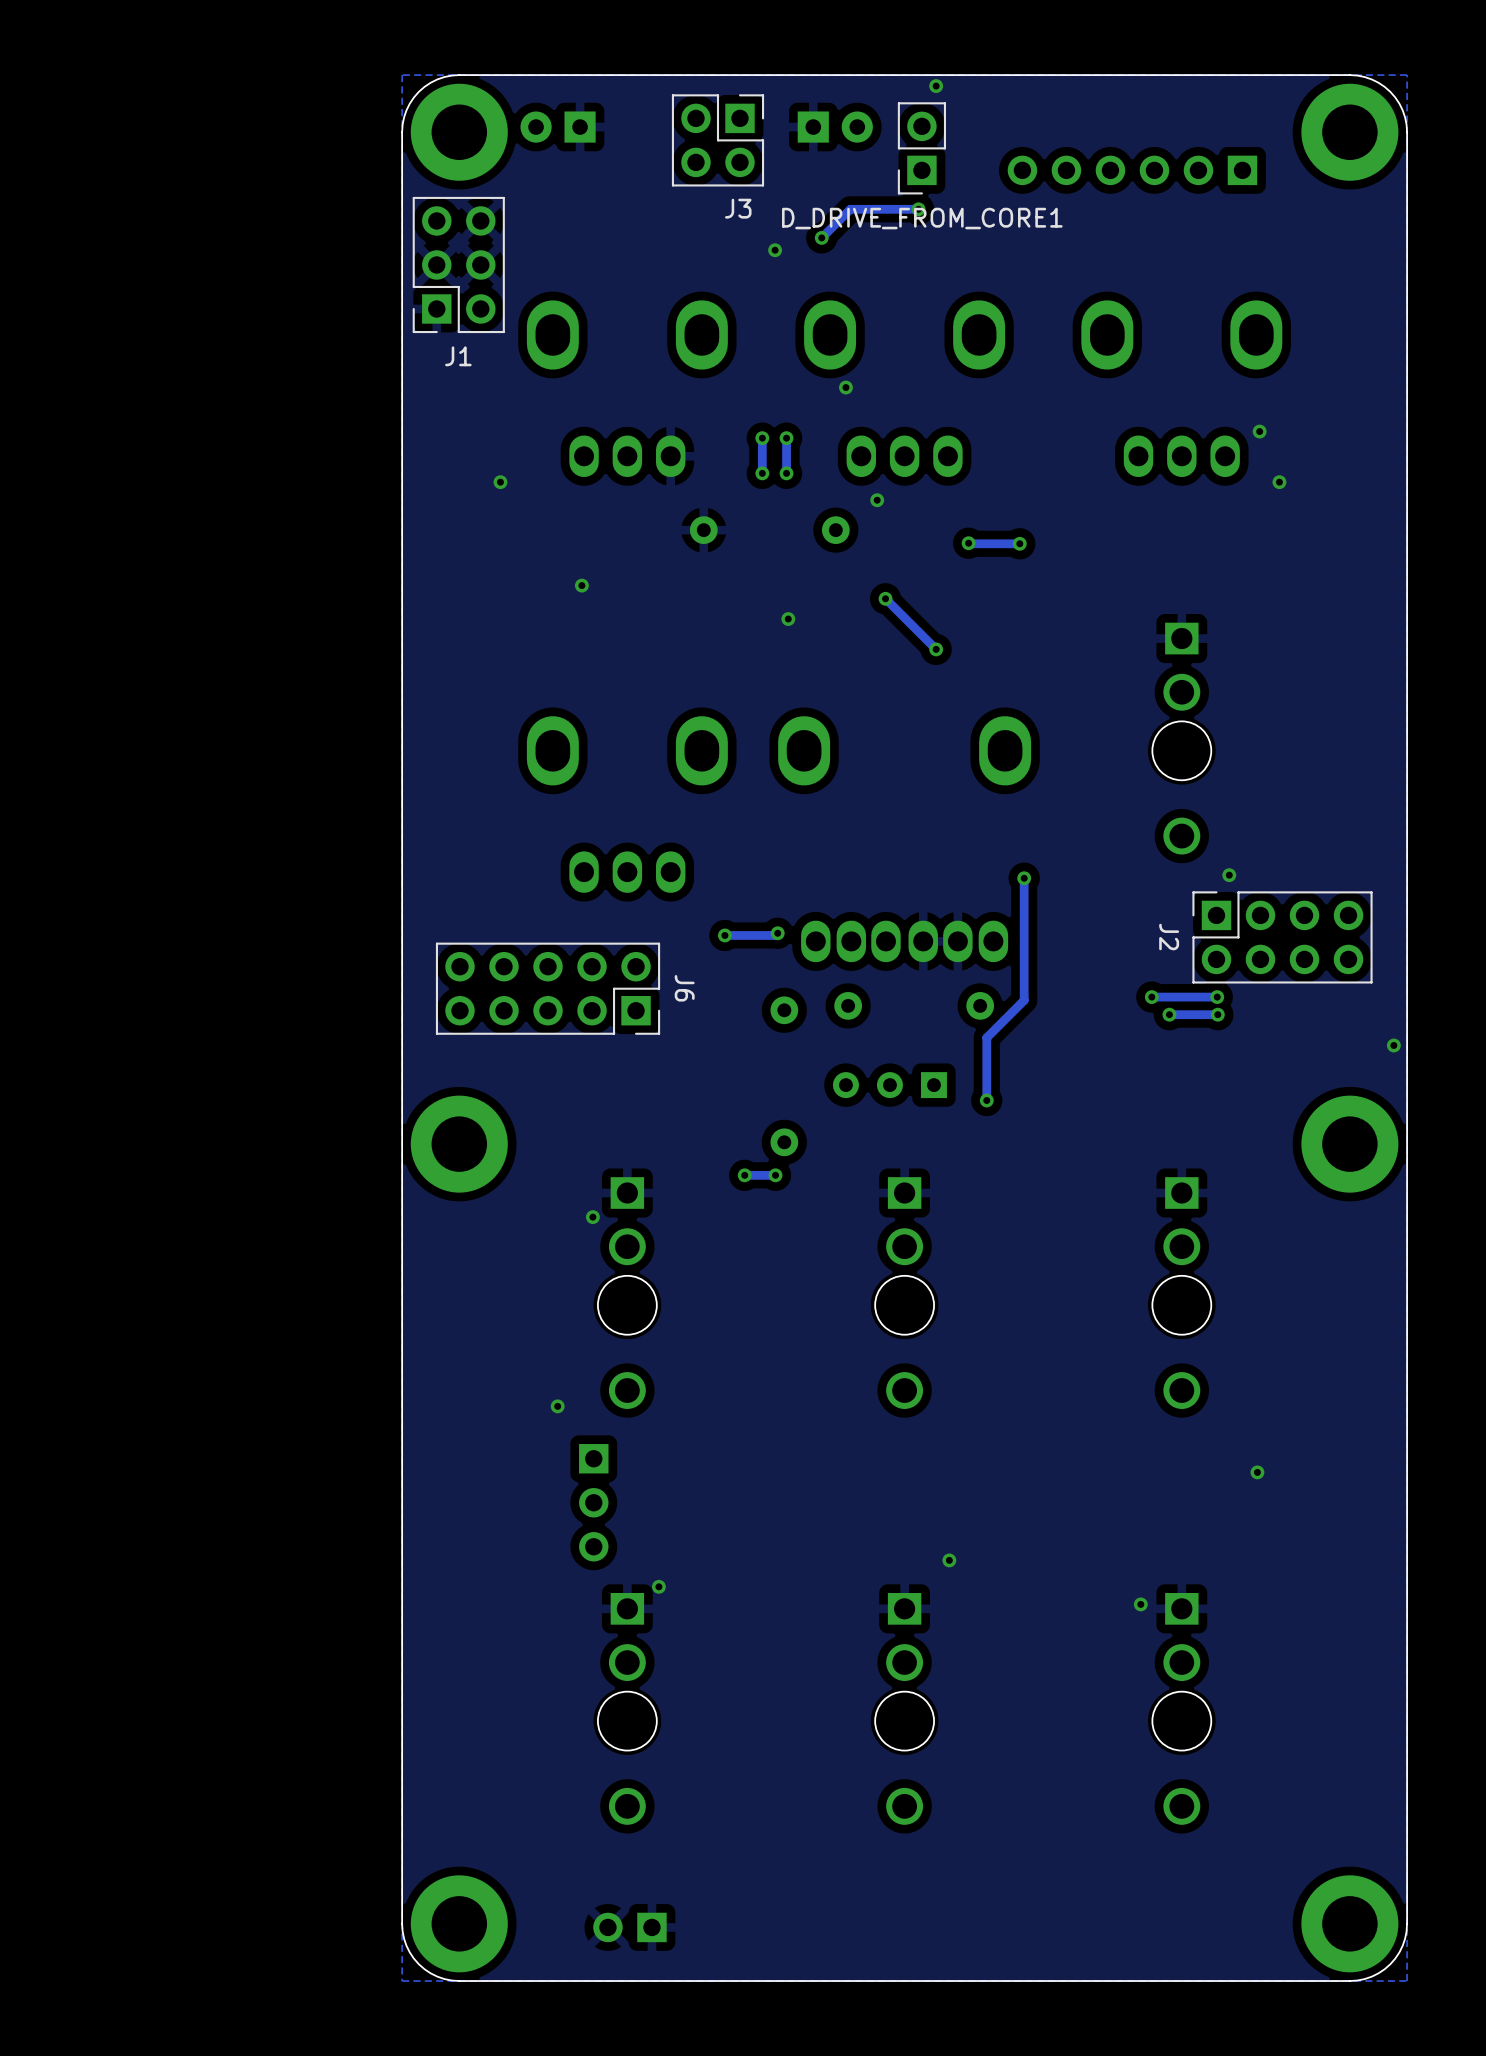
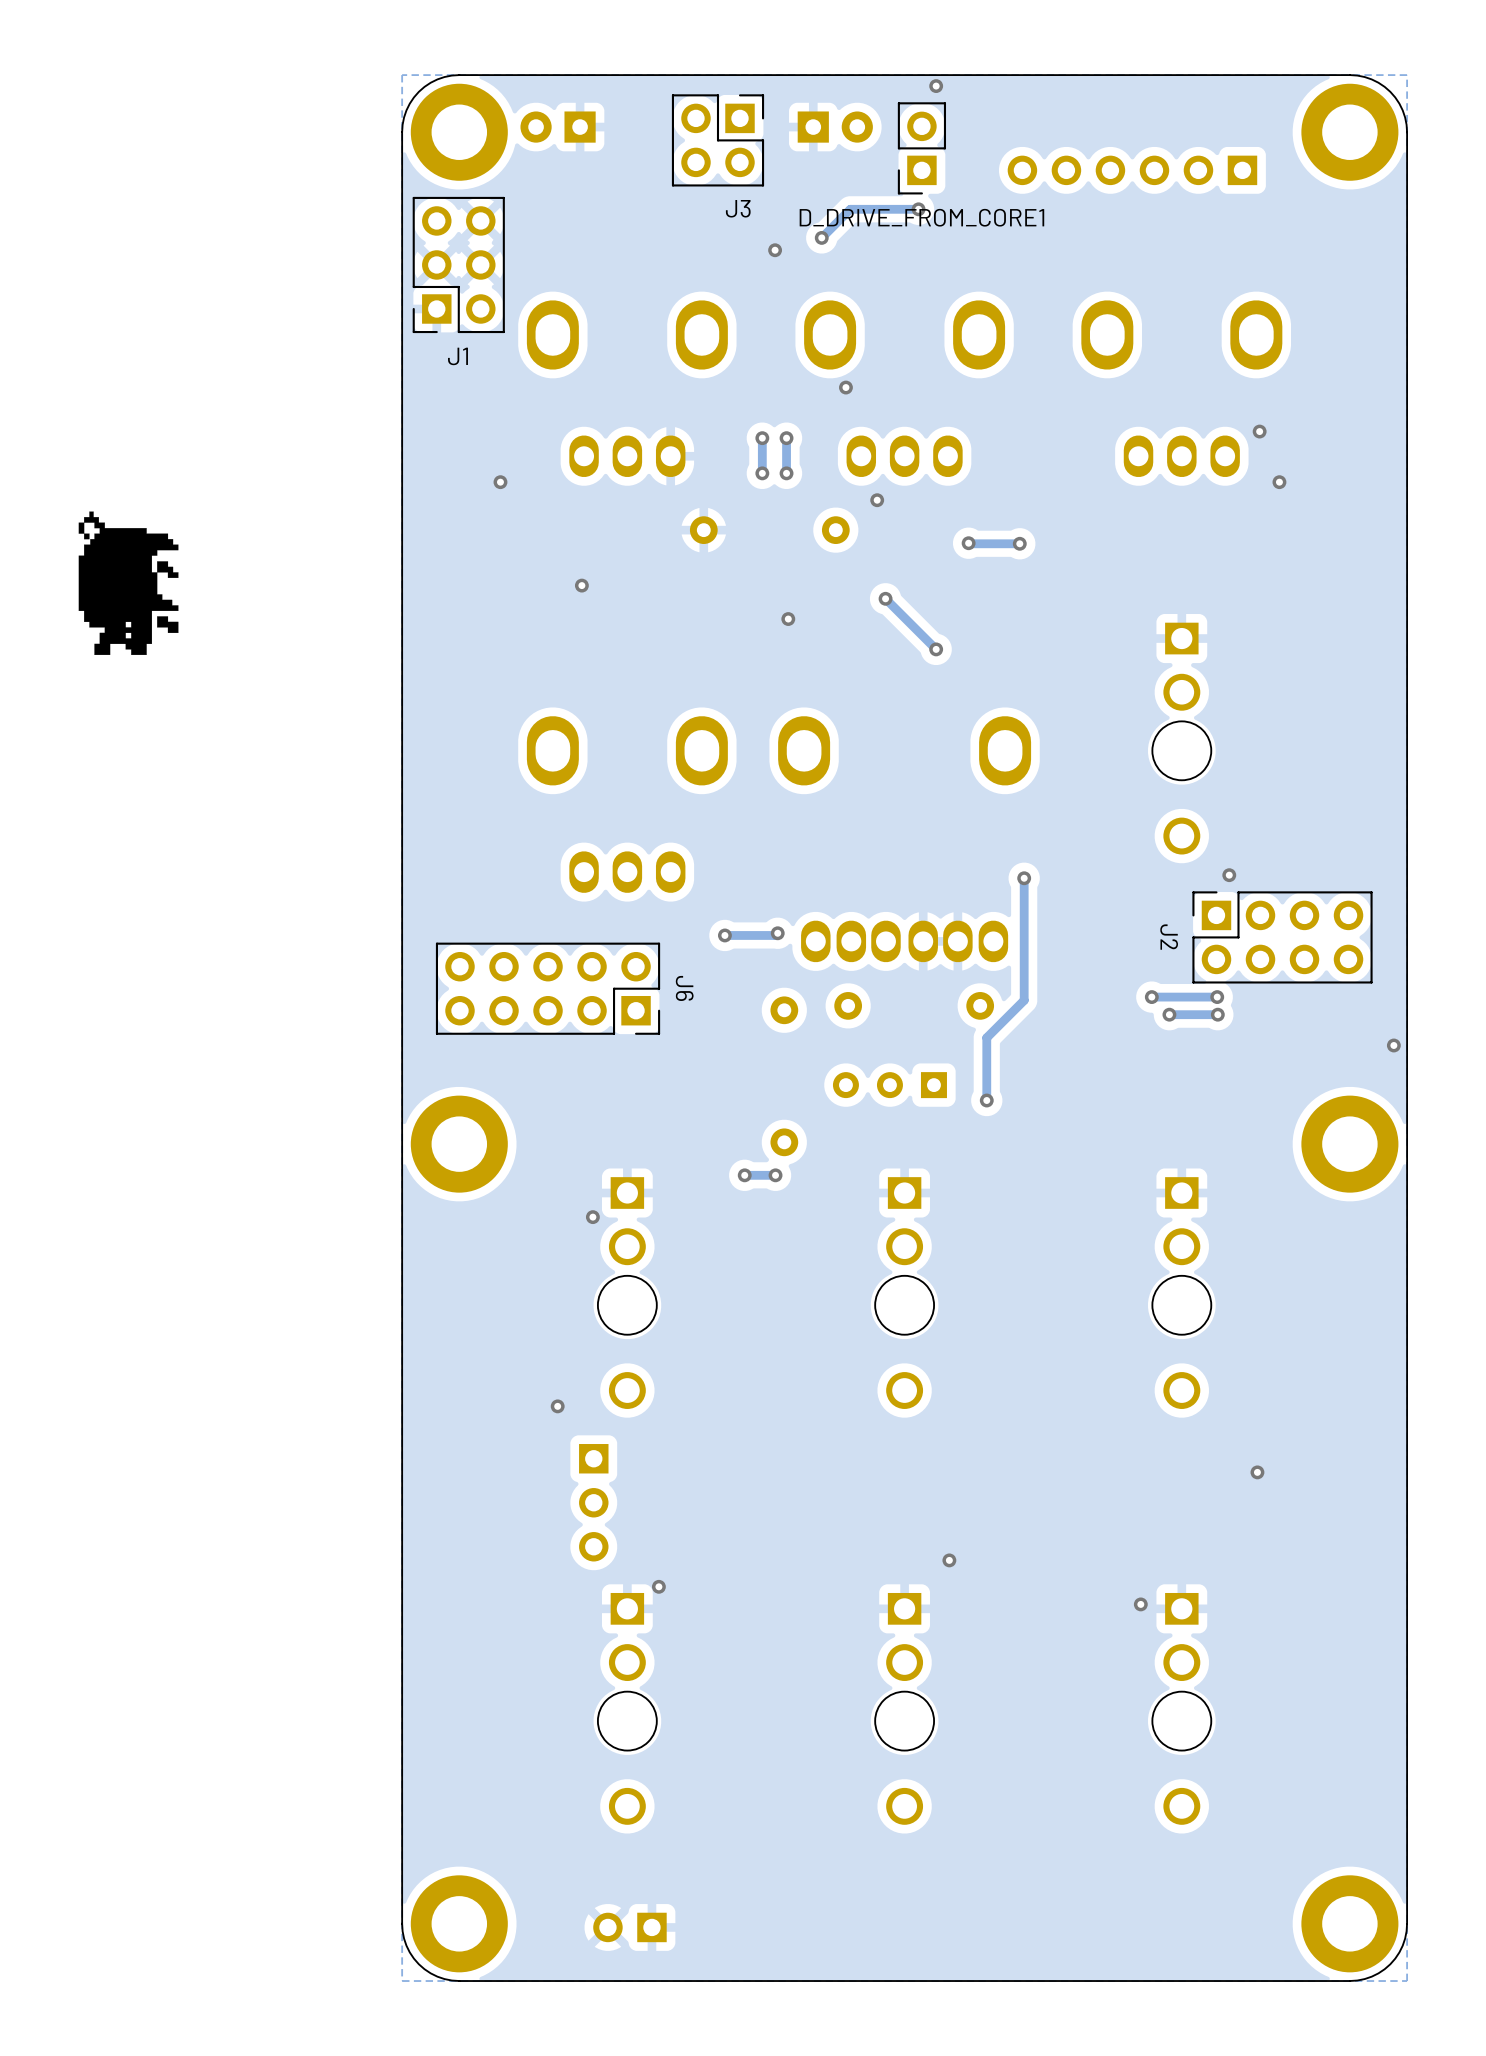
drawing: none -> [78, 511, 179, 655]

